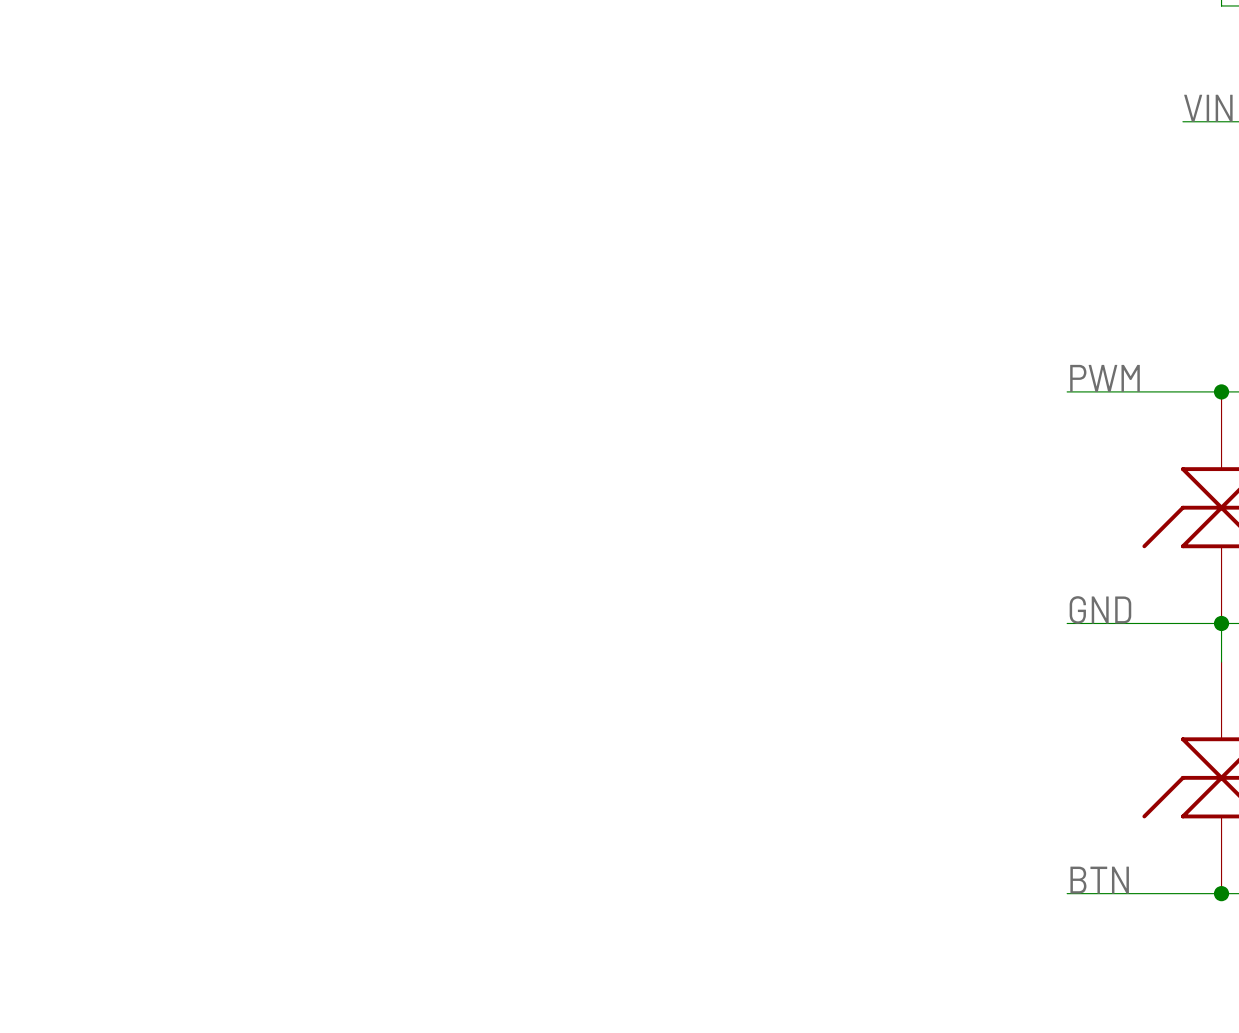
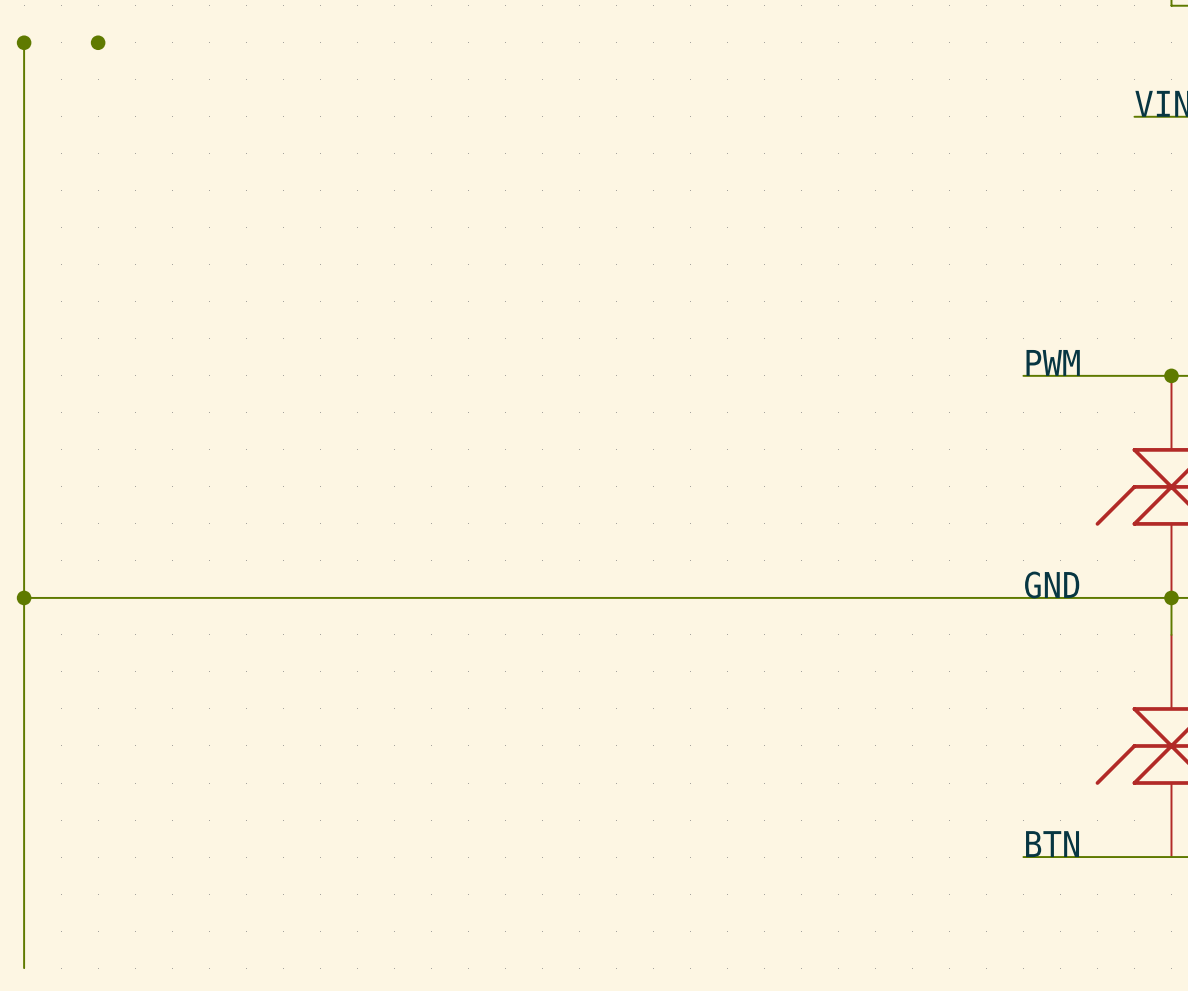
wire: none -> (24, 42) (24, 968)
junction: none -> (24, 42)
junction: none -> (98, 42)
wire: none -> (24, 597) (1023, 597)
junction: none -> (24, 597)
junction: (1221, 893) -> none

